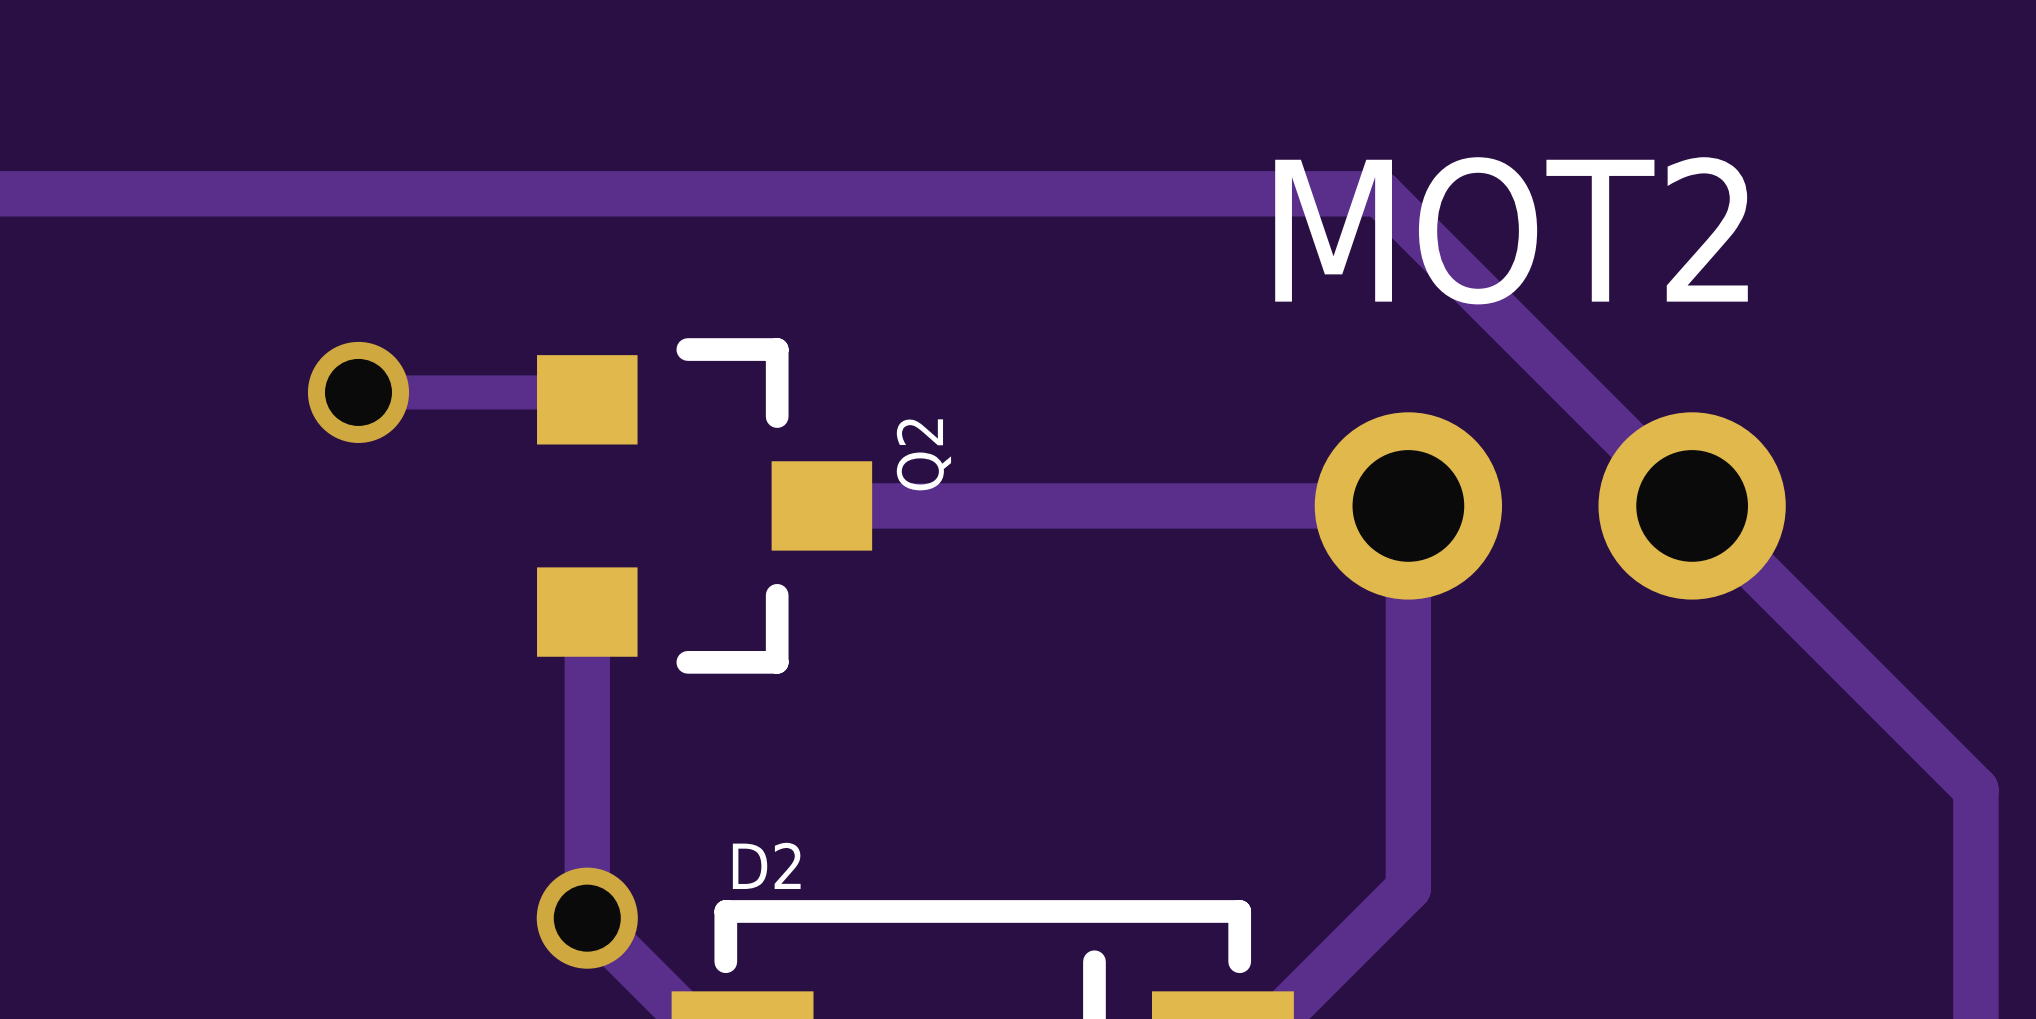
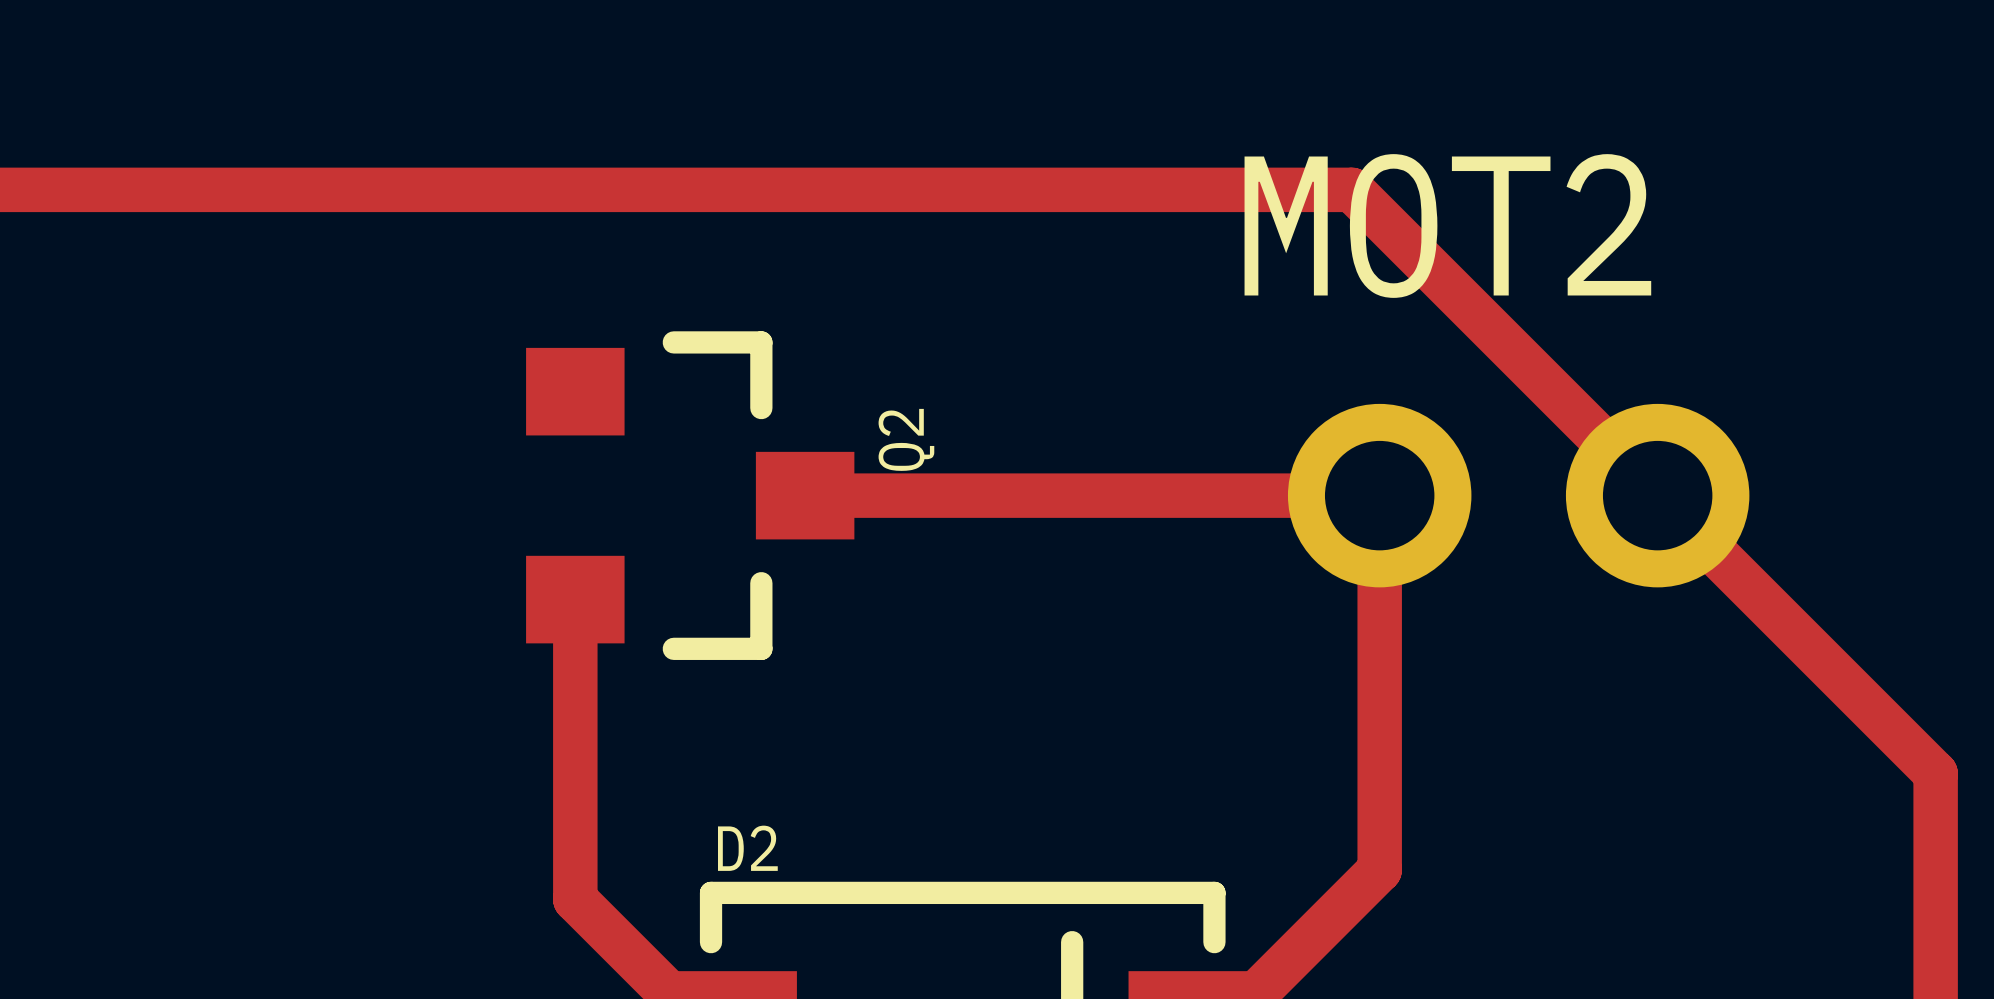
track: (358, 392) (579, 392) (587, 399) -> none
via: (358, 392) -> none
via: (587, 918) -> none

